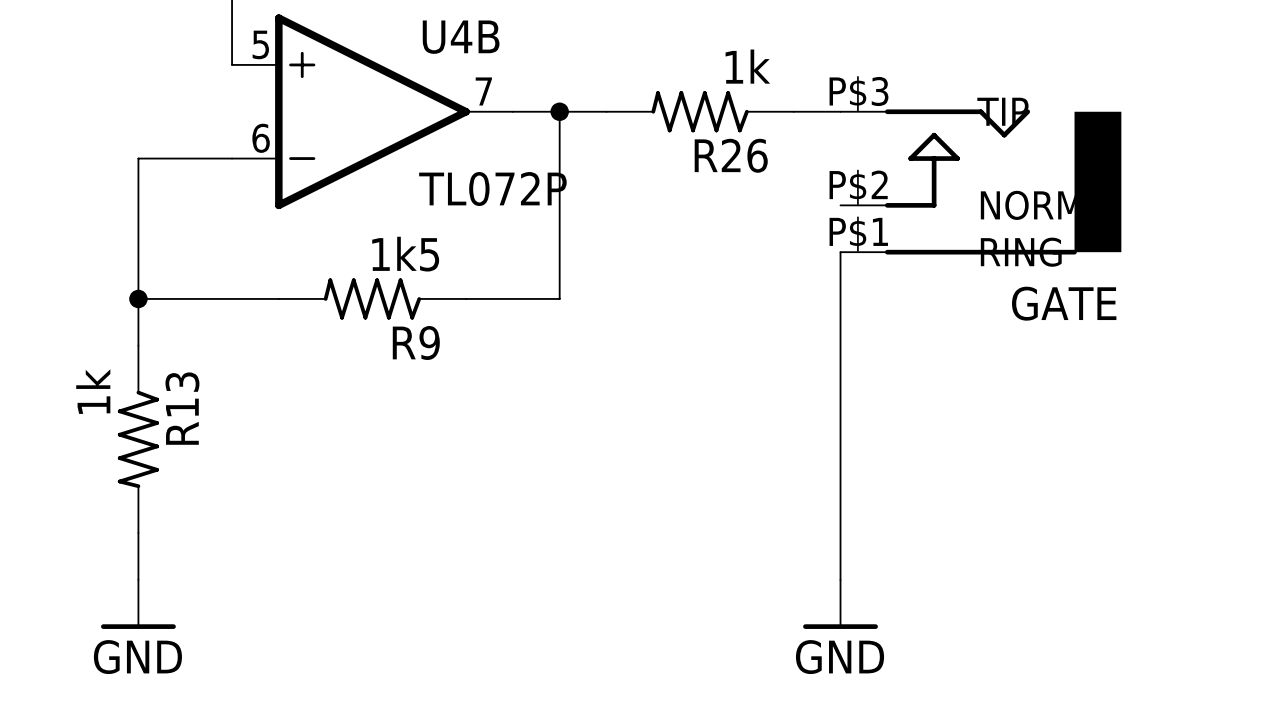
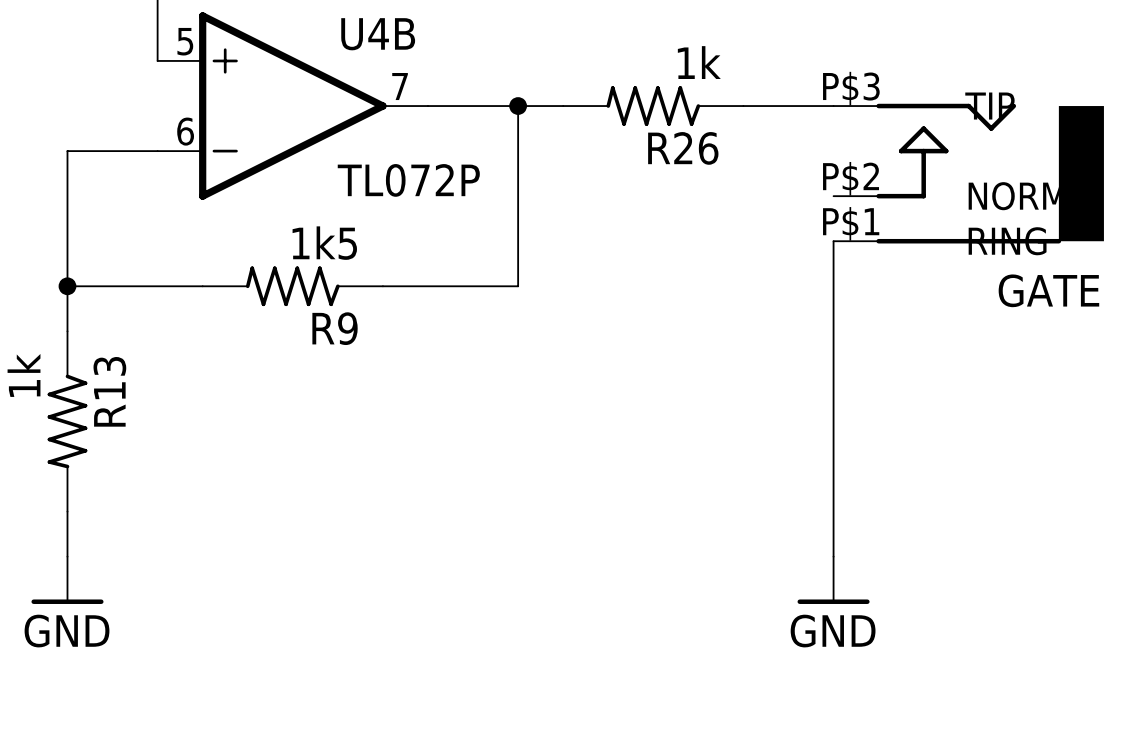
wire: (559, 111) (559, 298) -> (563, 106) (518, 106) (518, 286) (473, 286)
junction position: (559, 111) -> (518, 106)
R26 position: (700, 111) -> (653, 106)
GATE position: (980, 181) -> (968, 173)
wire: (840, 252) (840, 579) -> (833, 241) (833, 556)
power symbol position: GND (840, 604) -> GND (833, 580)

